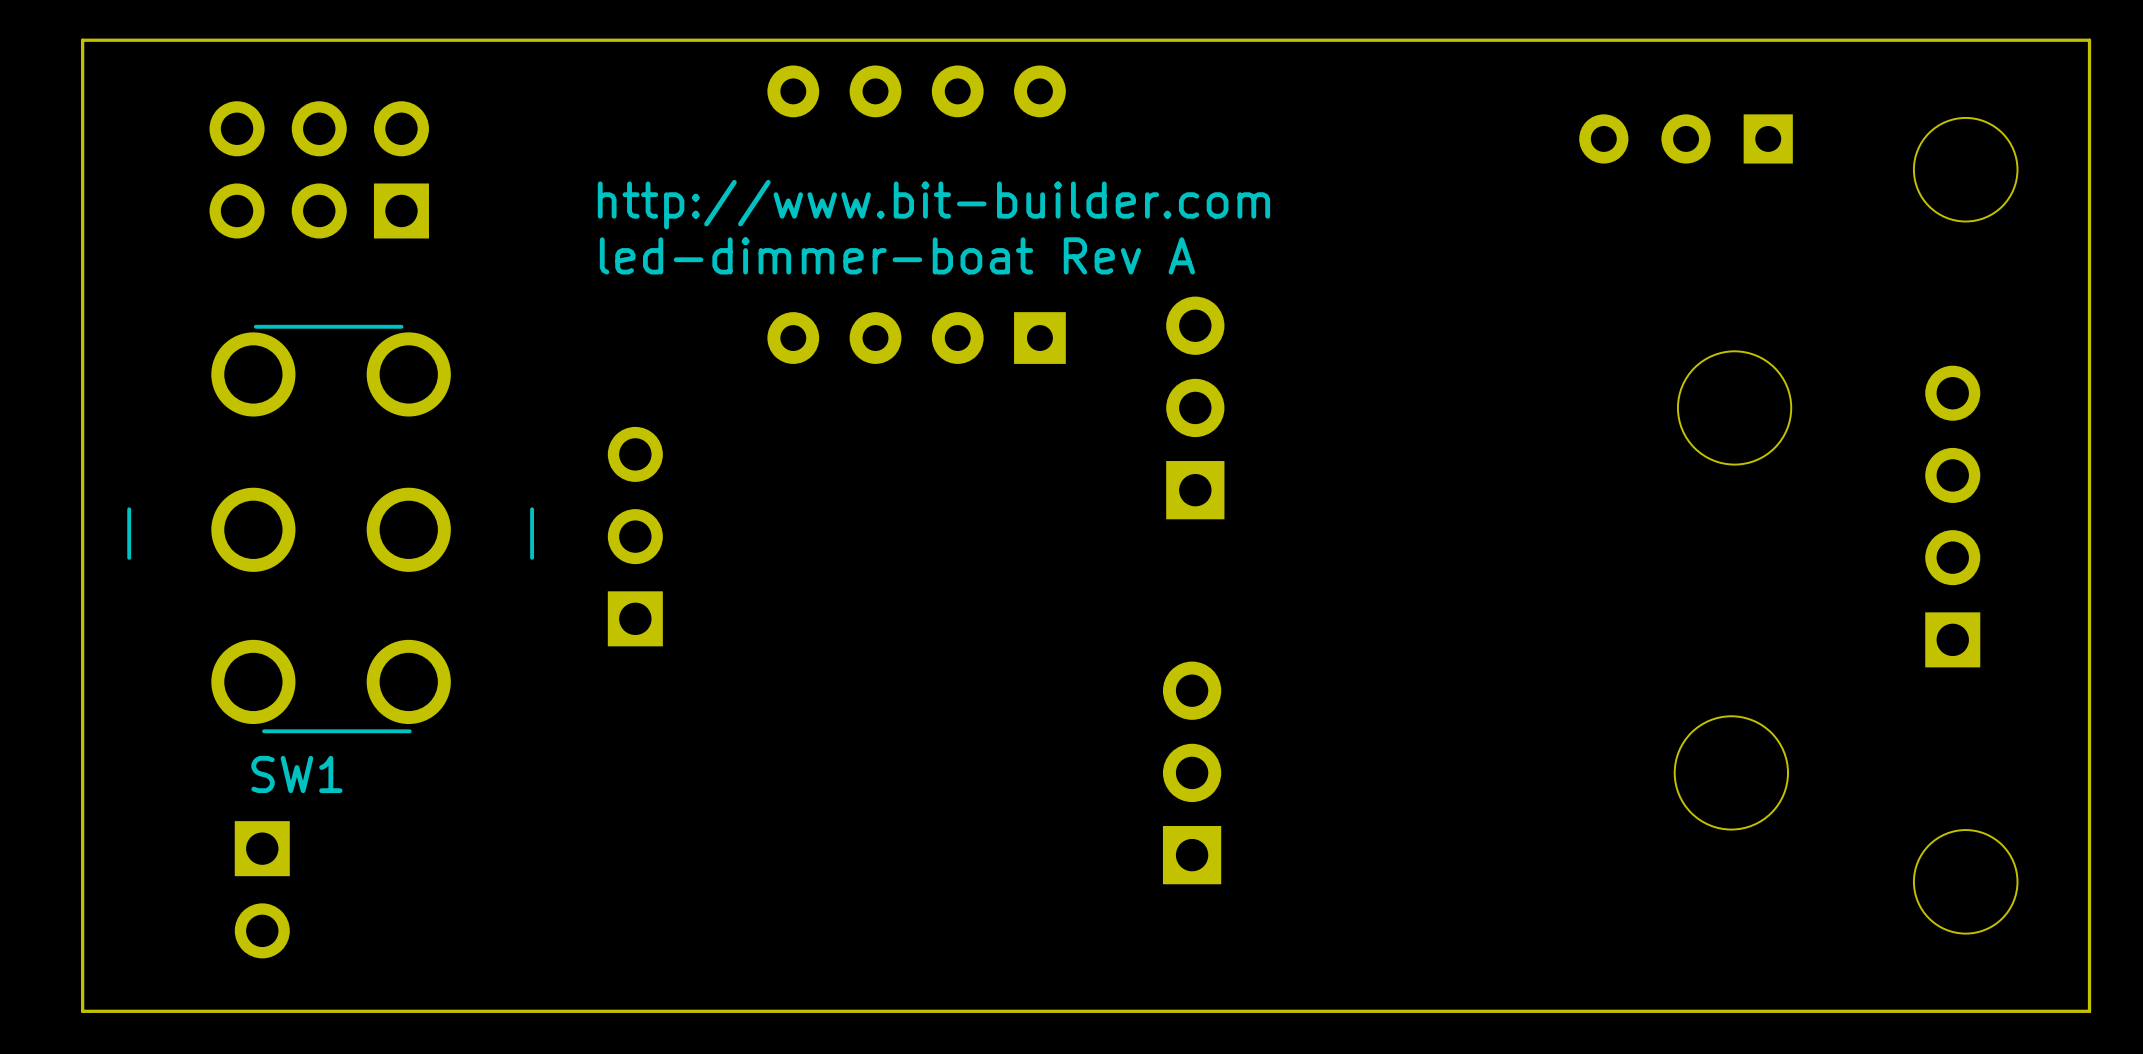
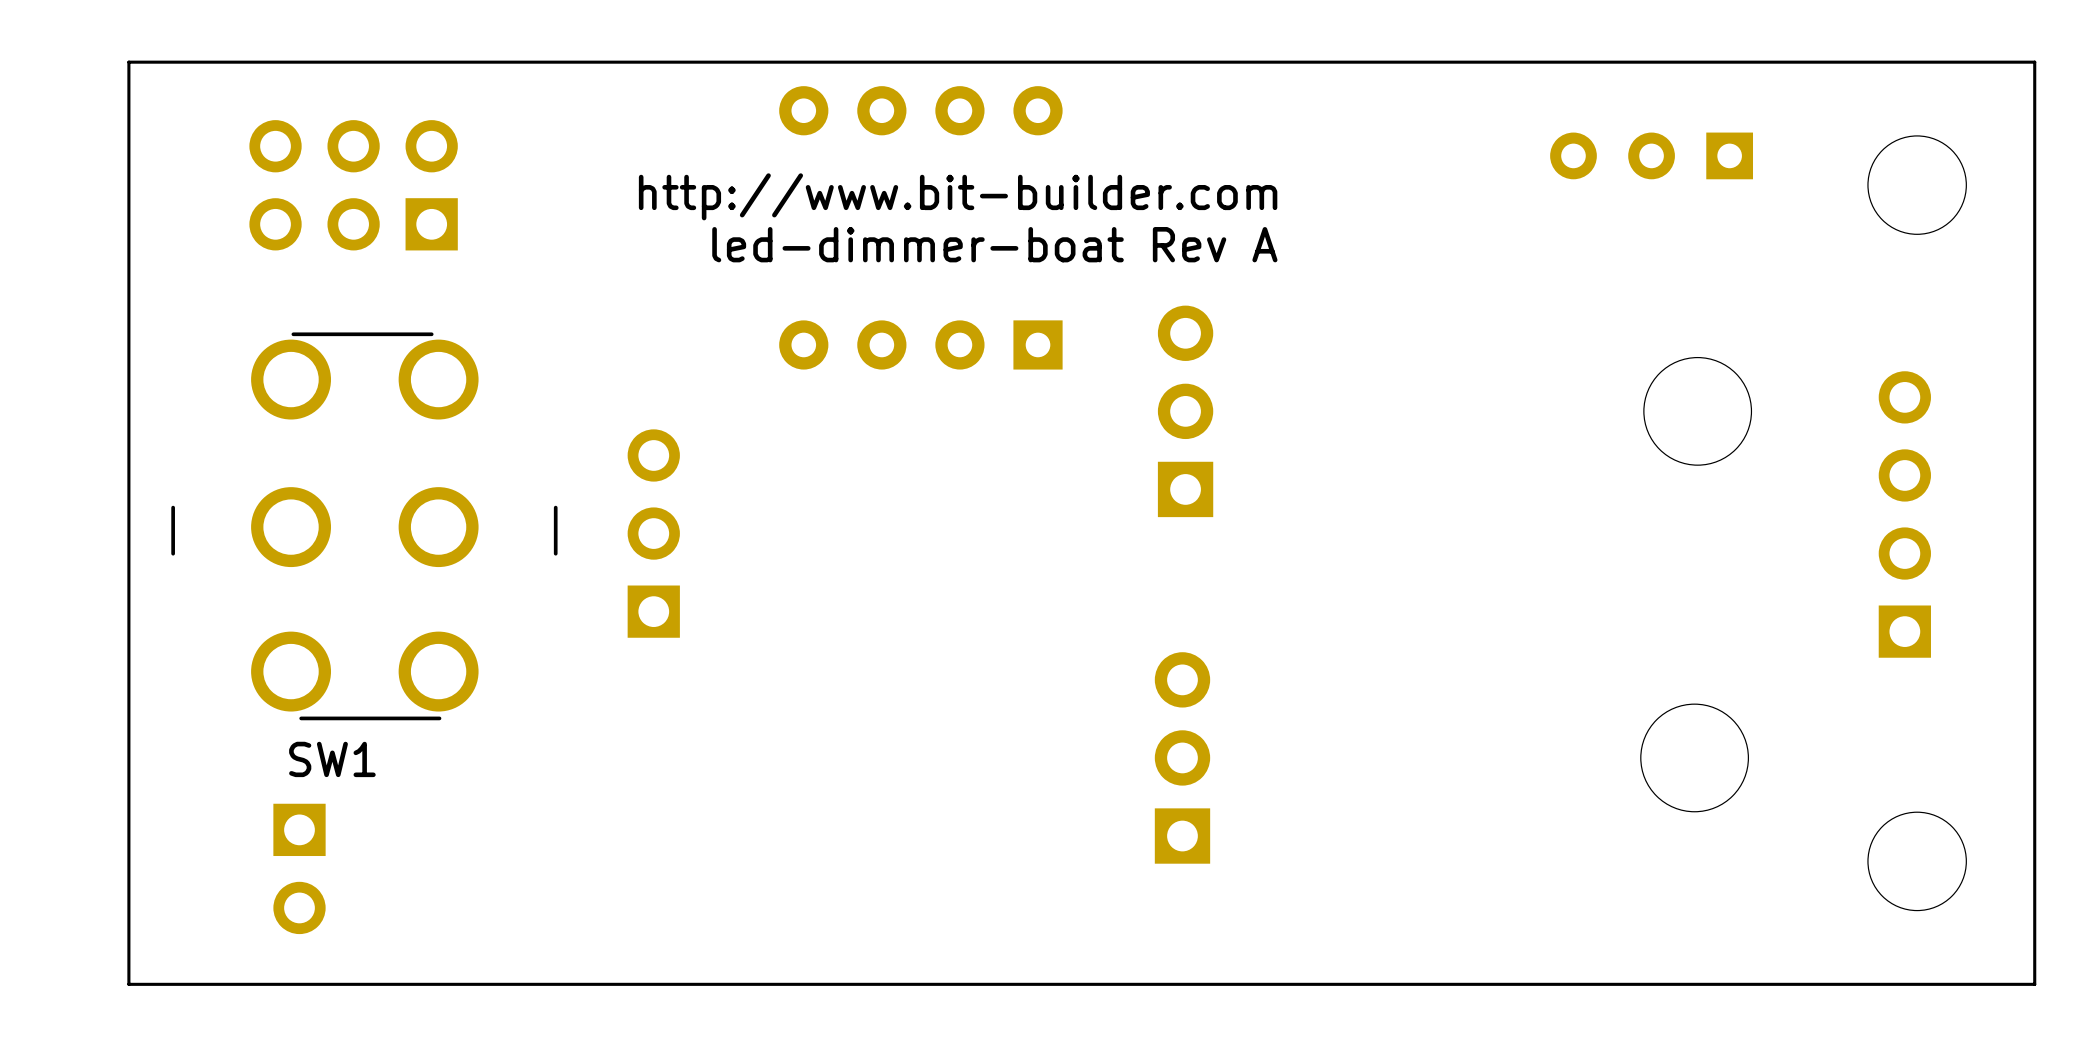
text position: http://www.bit-builder.com (933, 204) -> http://www.bit-builder.com (958, 196)
text position: led-dimmer-boat Rev A (897, 255) -> led-dimmer-boat Rev A (994, 244)

